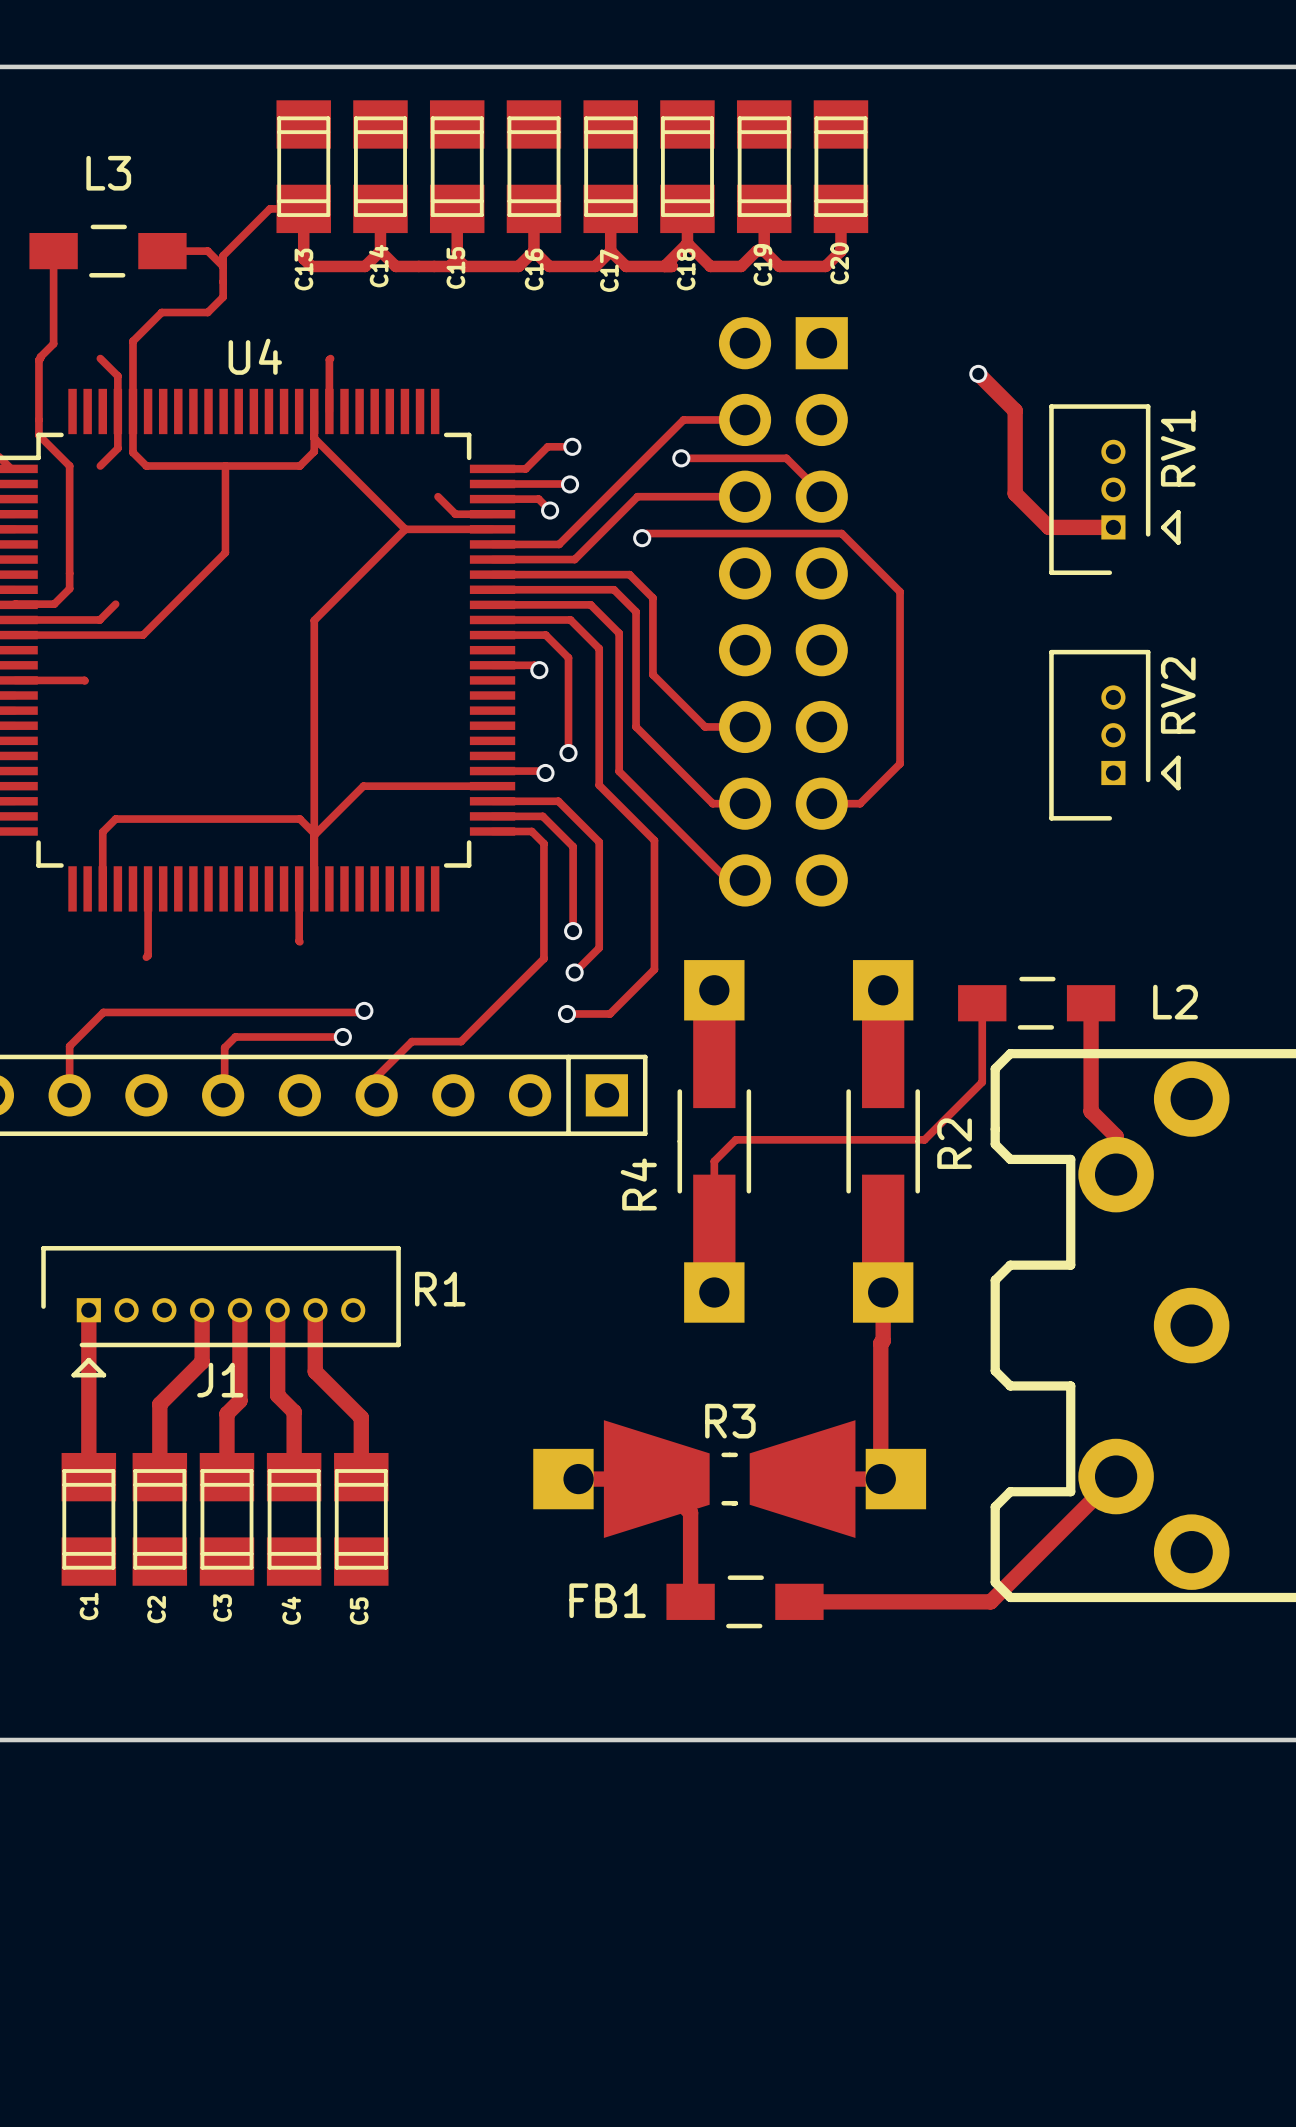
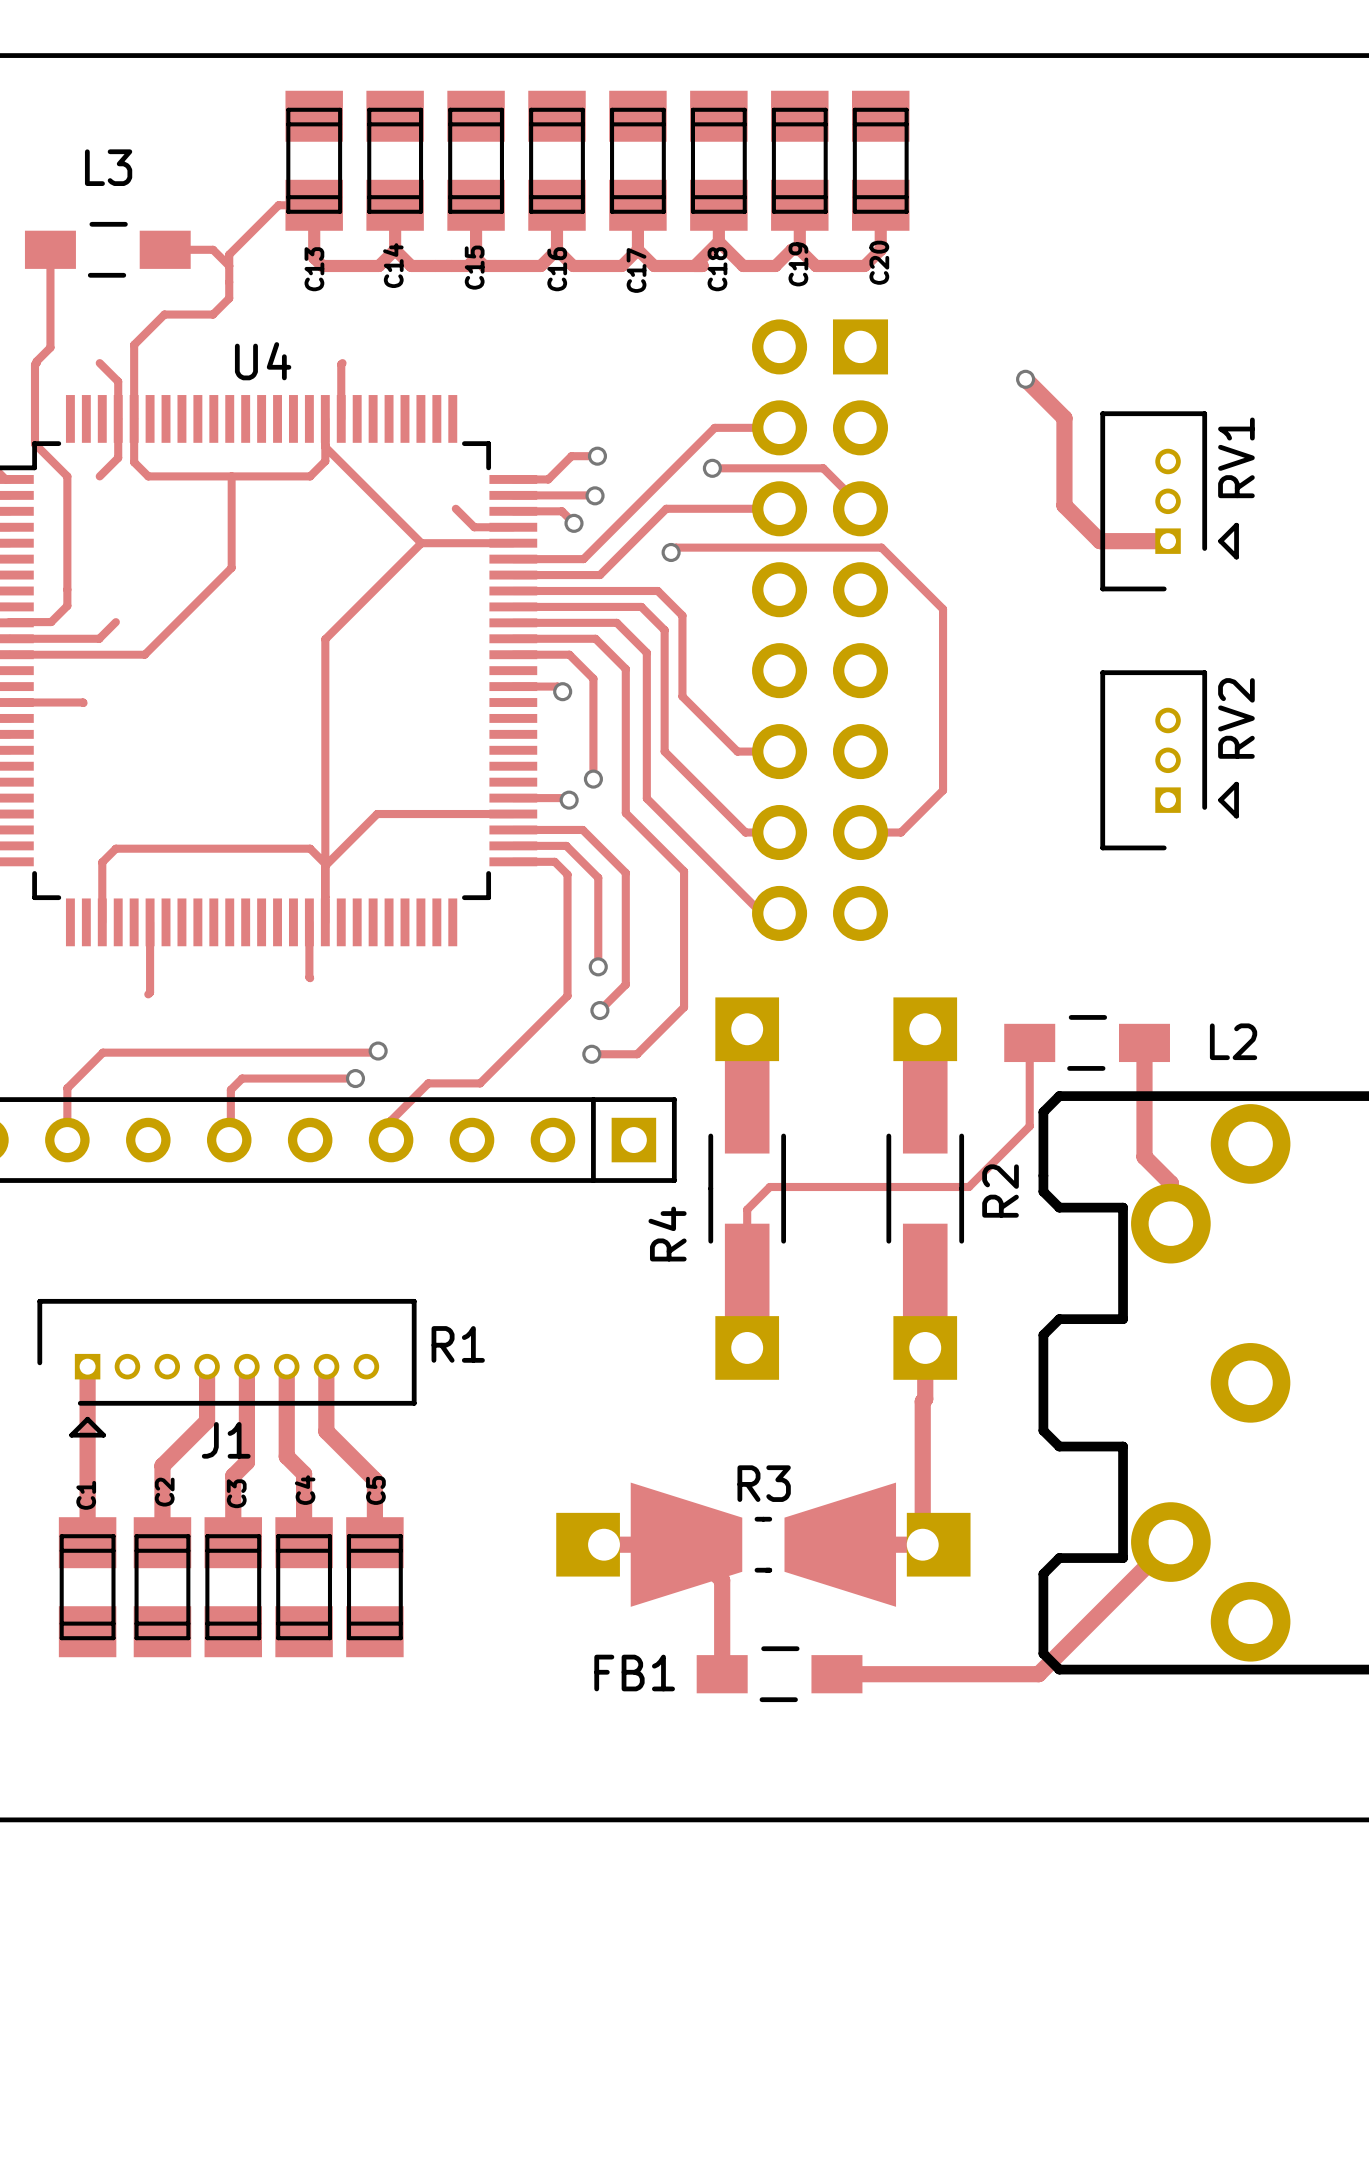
C1 name position: C1 (89, 1606) -> C1 (86, 1495)
C3 name position: C3 (222, 1608) -> C3 (236, 1493)
C2 name position: C2 (156, 1609) -> C2 (164, 1492)
C4 name position: C4 (291, 1610) -> C4 (305, 1490)
C5 name position: C5 (359, 1611) -> C5 (375, 1490)

